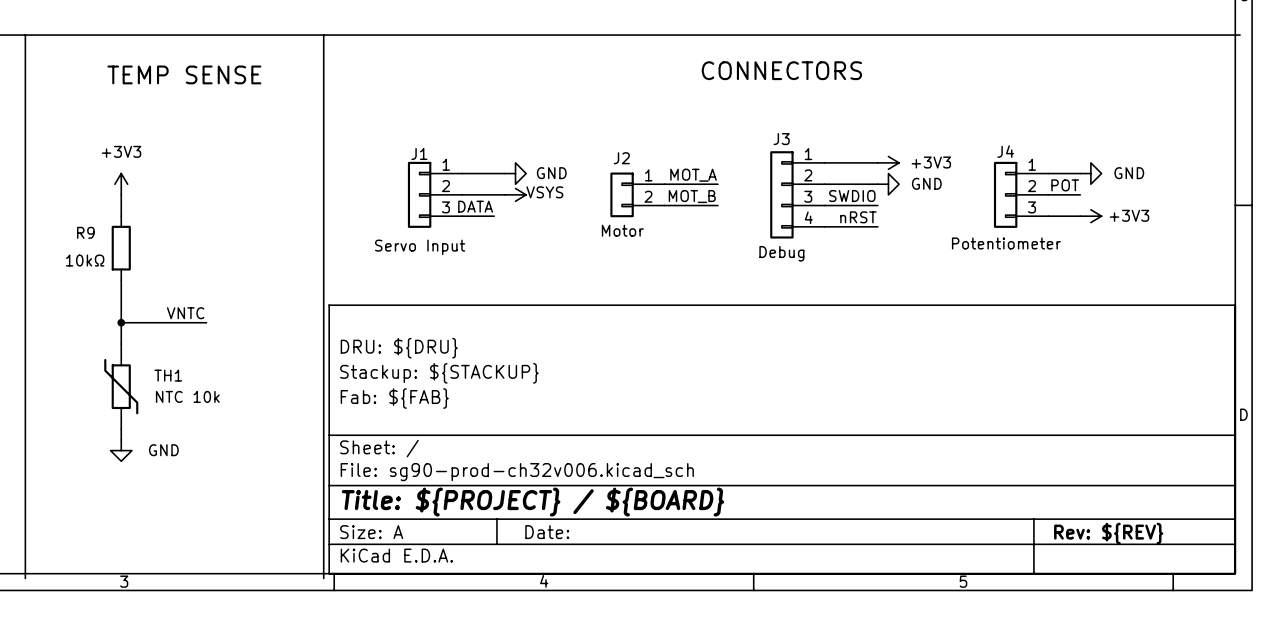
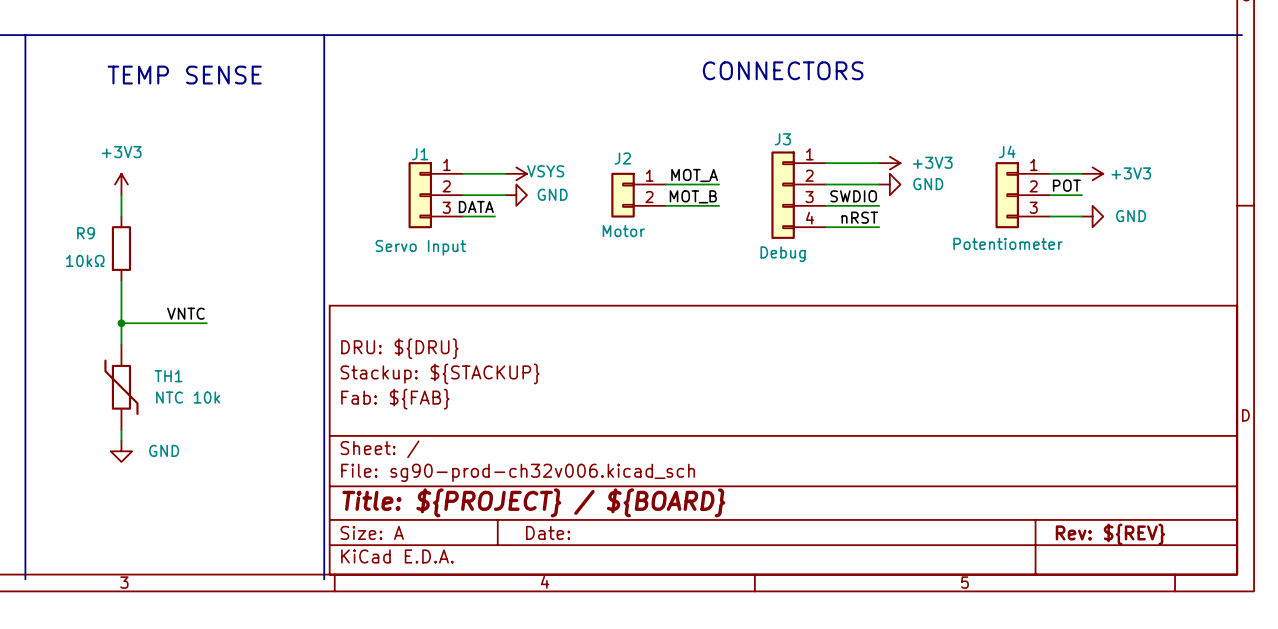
power symbol: GND (515, 173) -> VSYS (516, 173)
power symbol: GND (1090, 173) -> +3V3 (1092, 173)
power symbol: VSYS (515, 194) -> GND (516, 195)
power symbol: +3V3 (1090, 216) -> GND (1092, 216)

